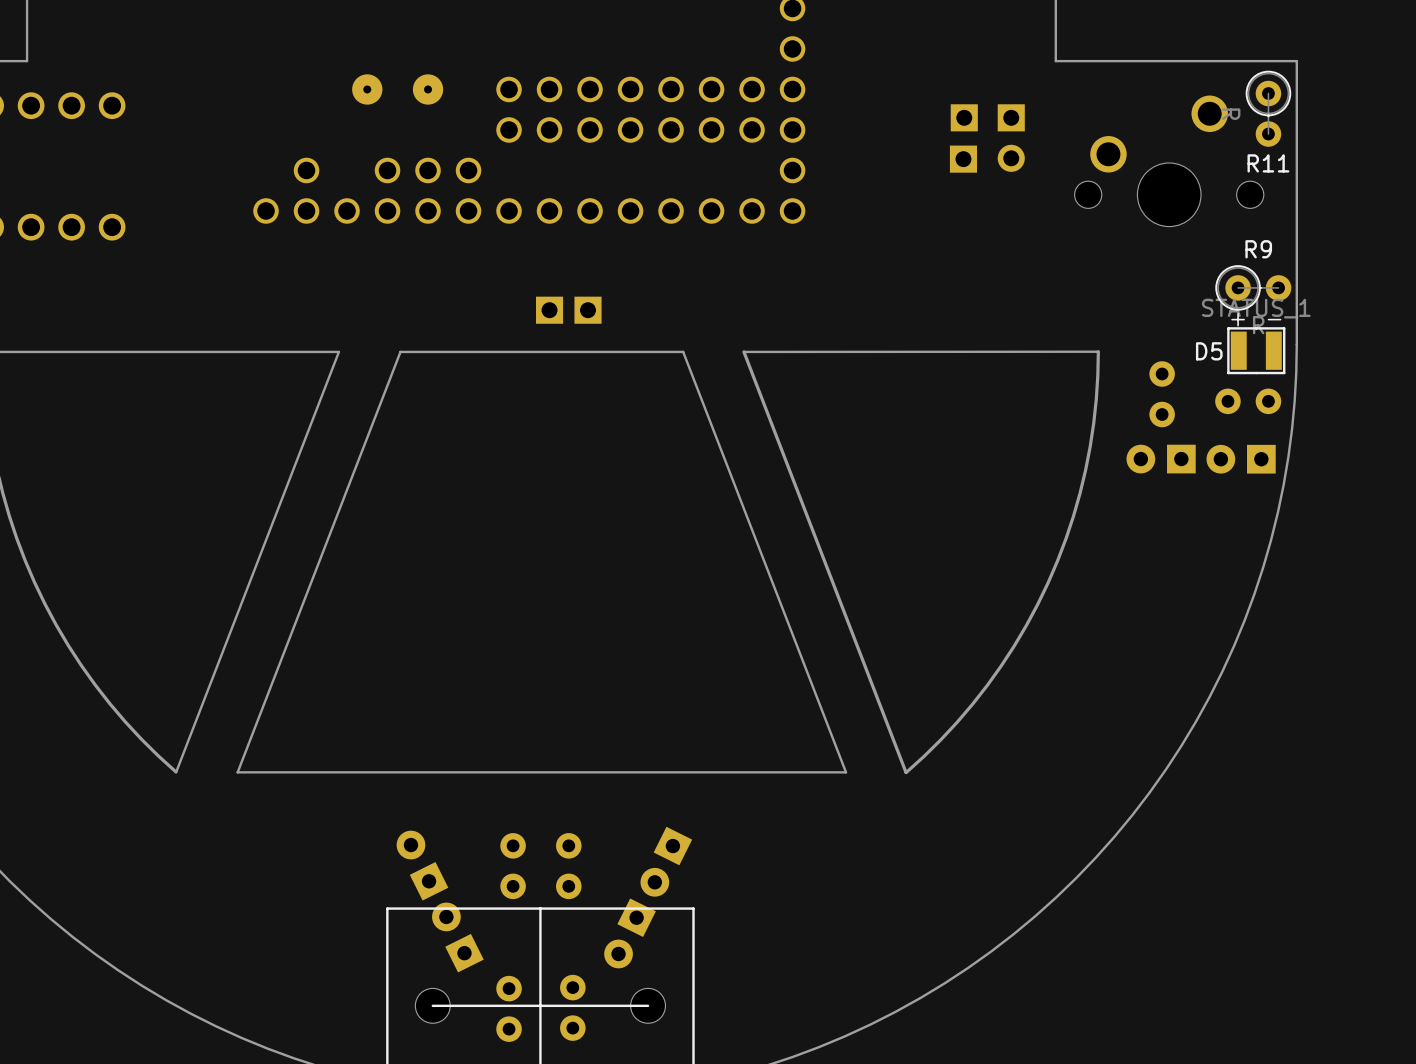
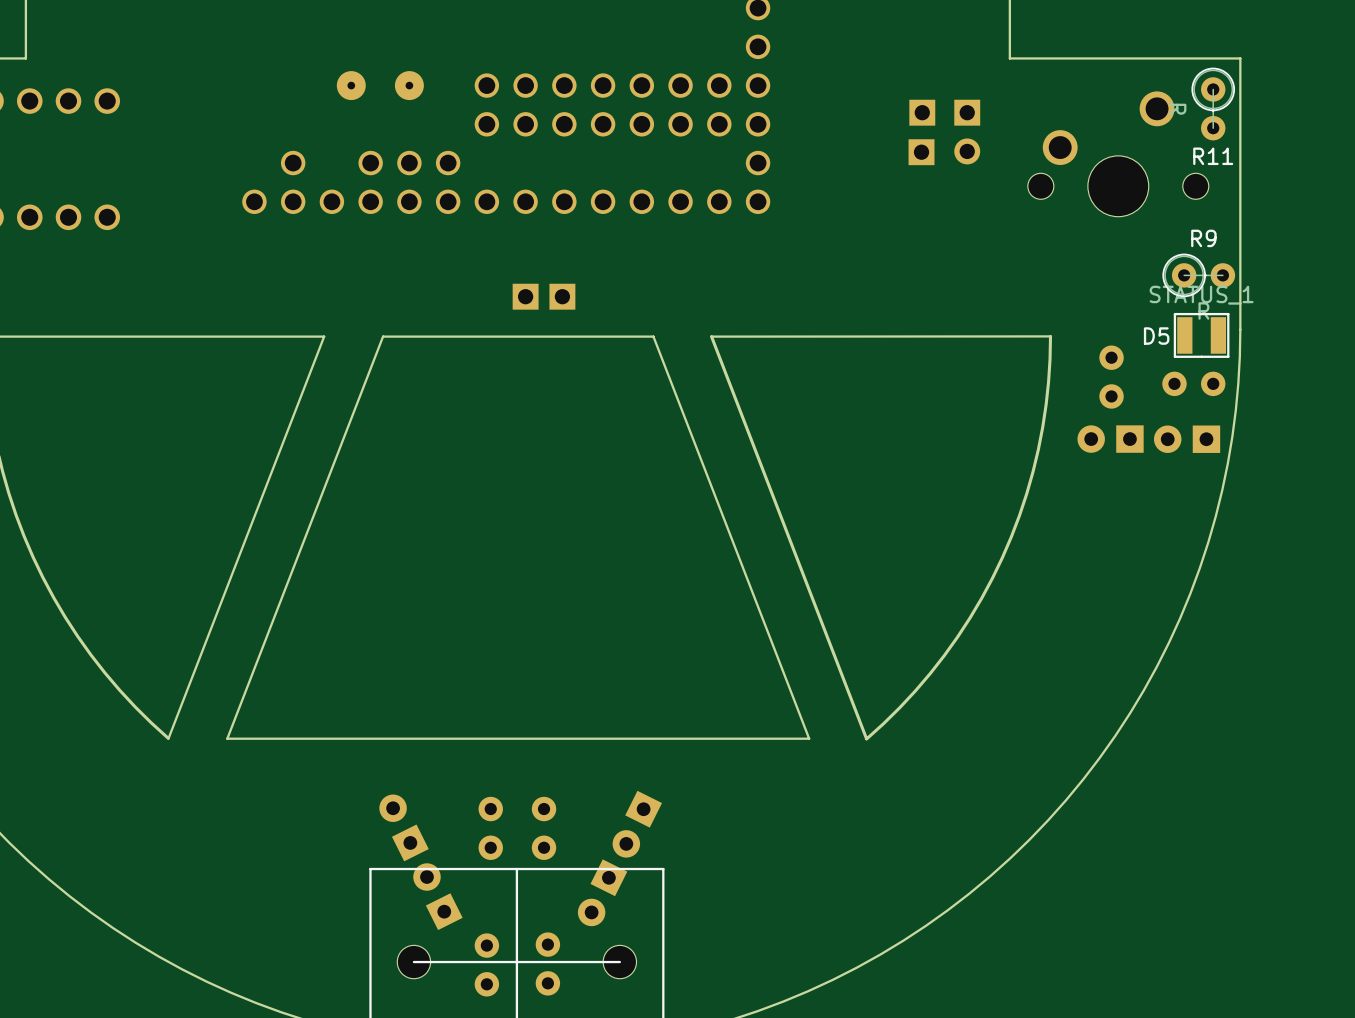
text: + (1238, 319) -> none
text: - (1274, 319) -> none

